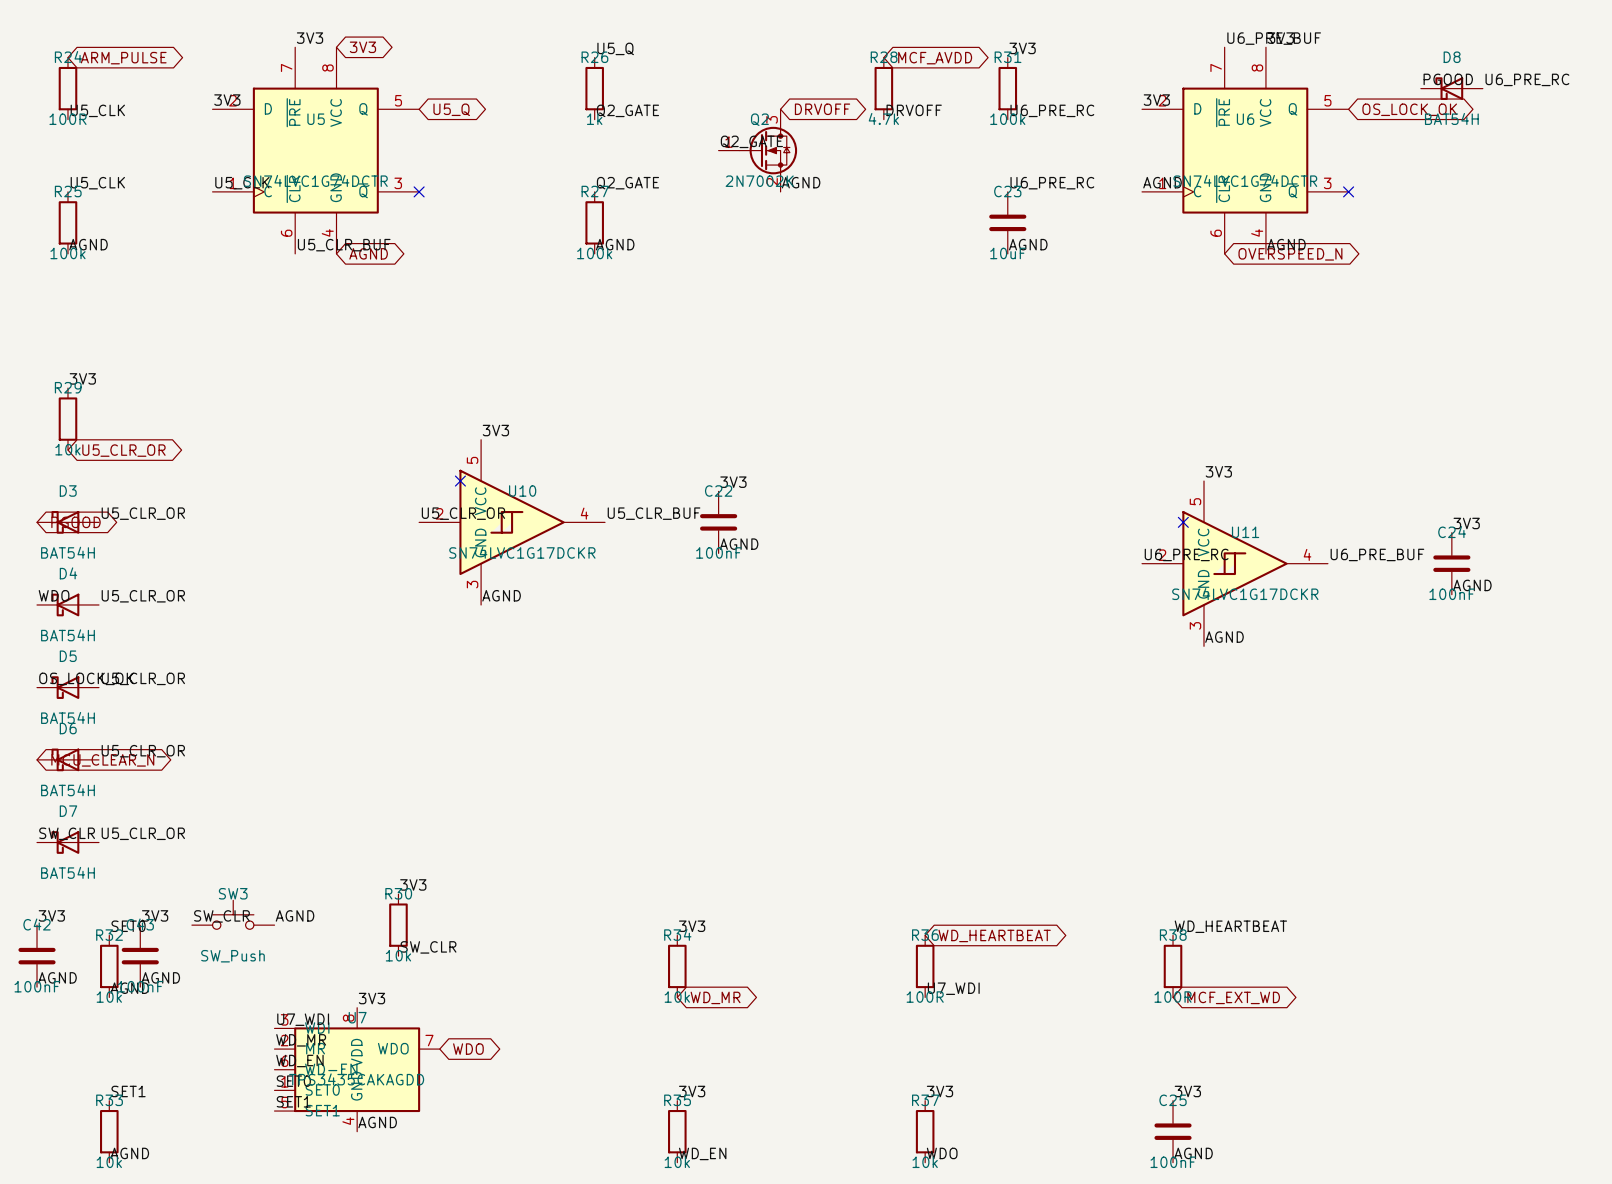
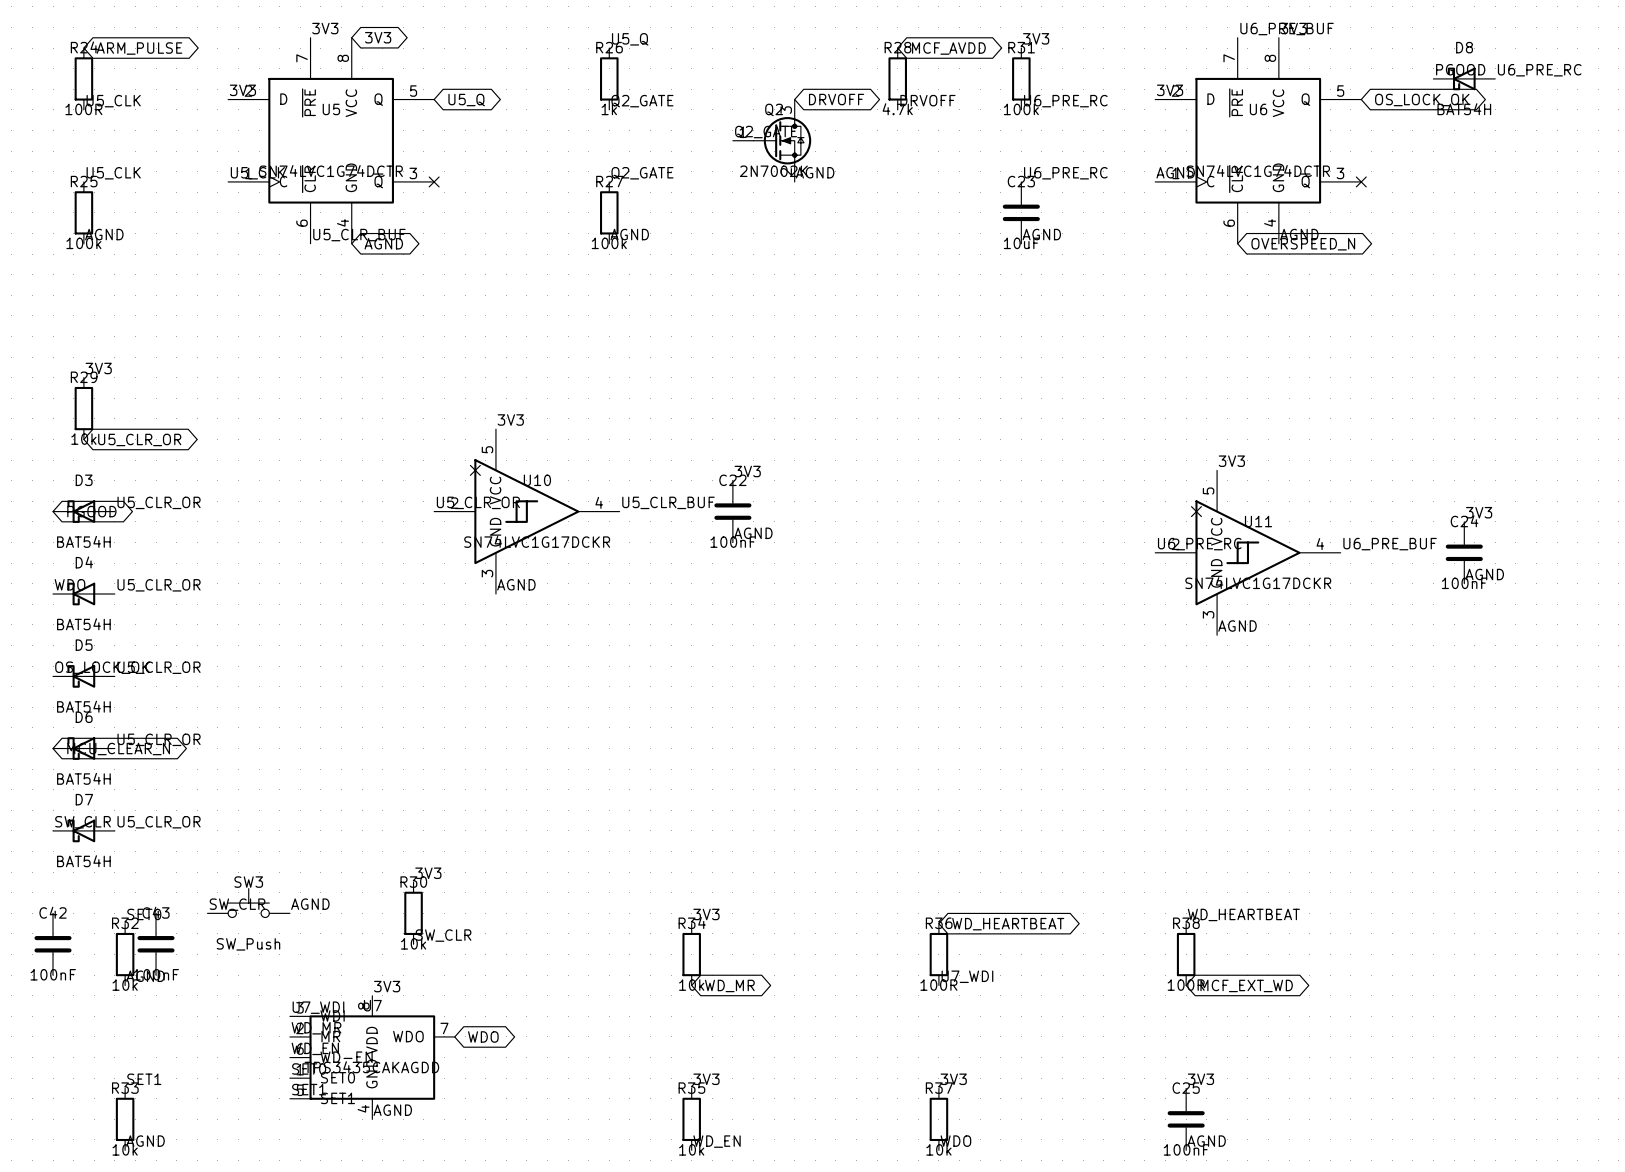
label: 3V3 (51, 915) -> none
label: 3V3 (155, 915) -> none
label: AGND (57, 977) -> none
label: AGND (160, 977) -> none

